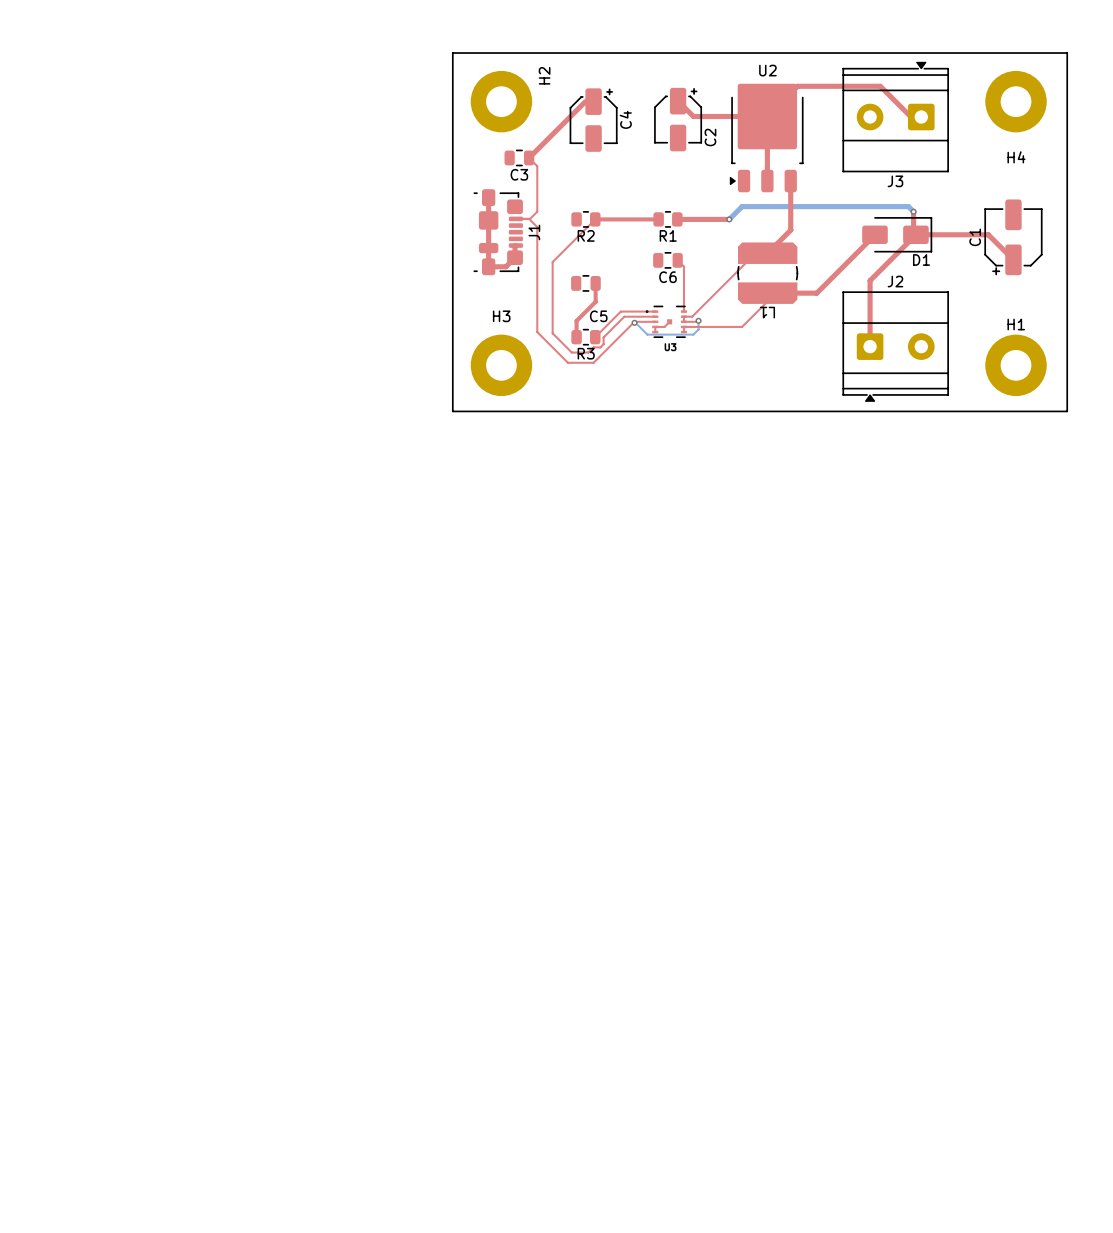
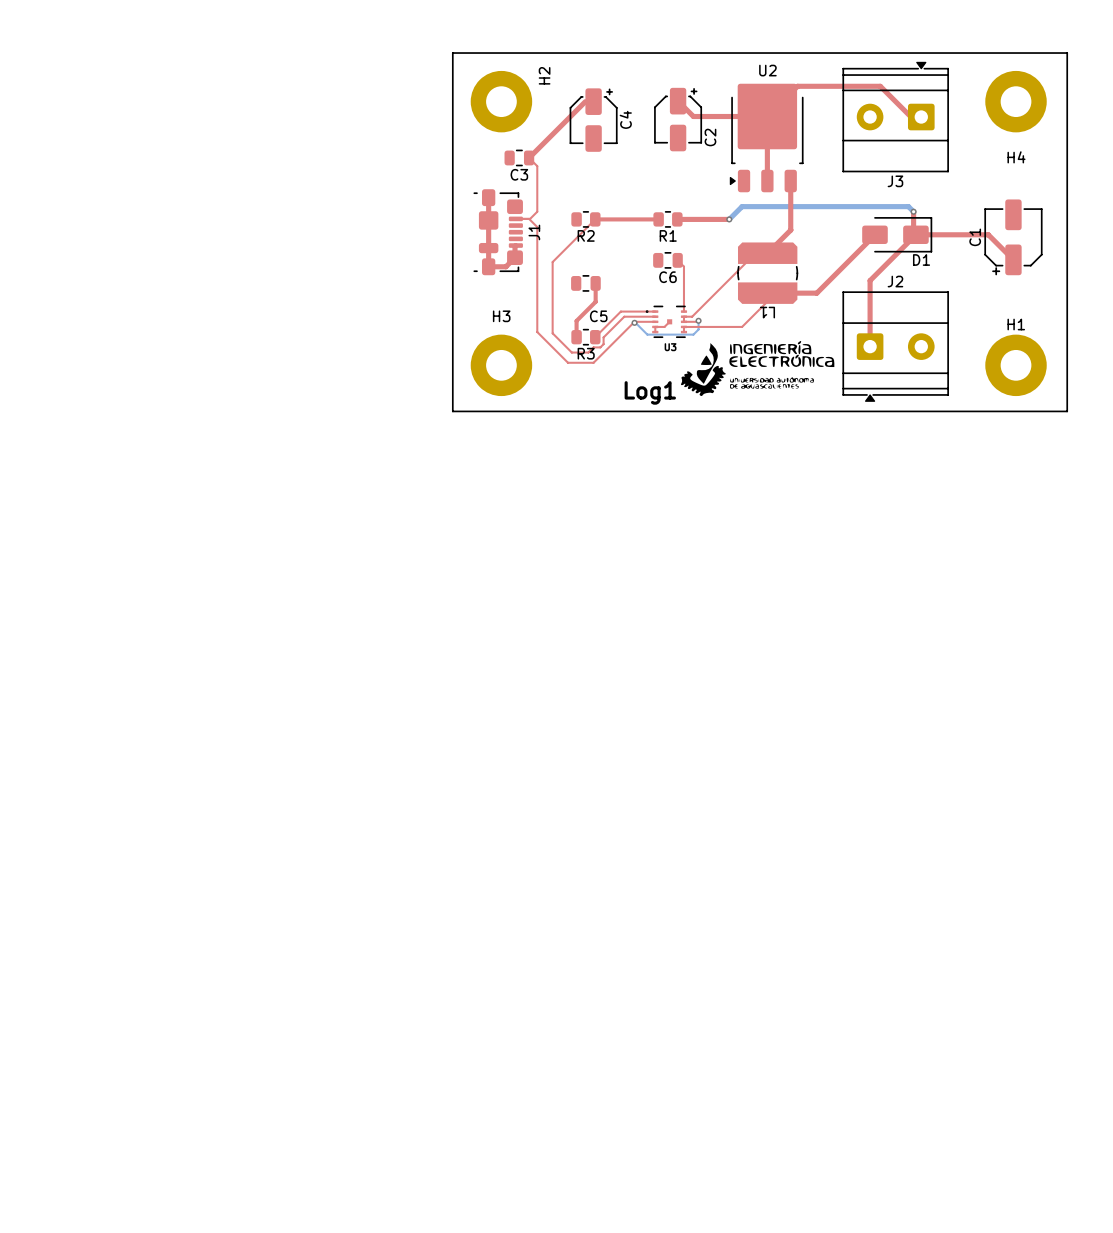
Log1: none -> (757, 368)

